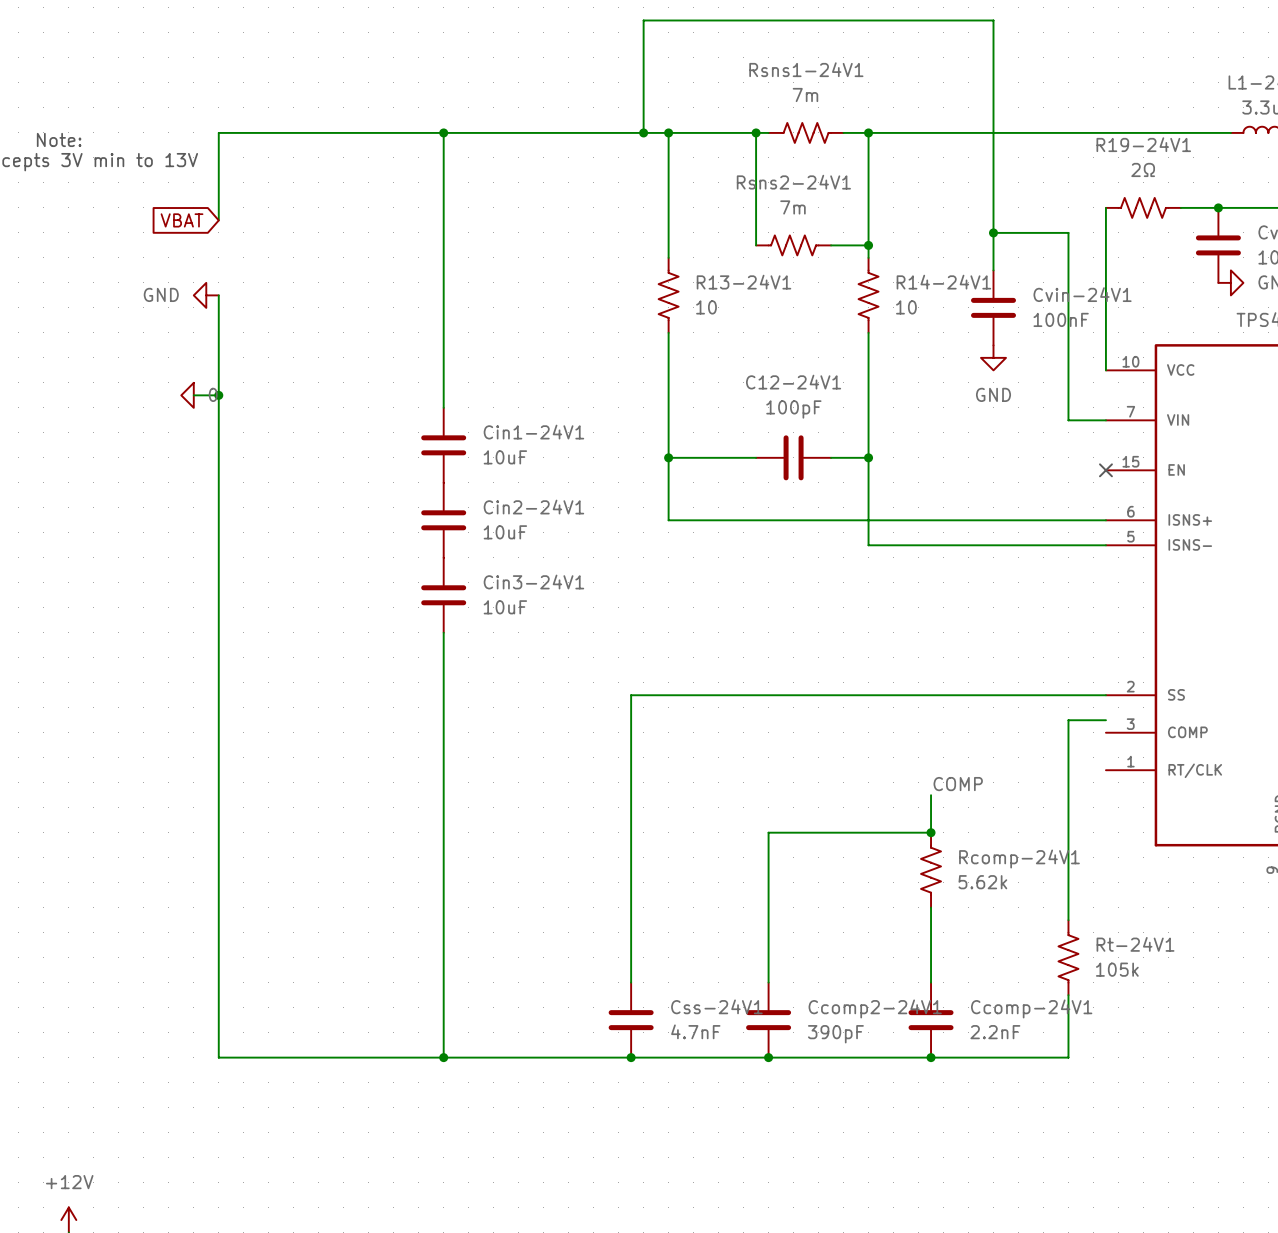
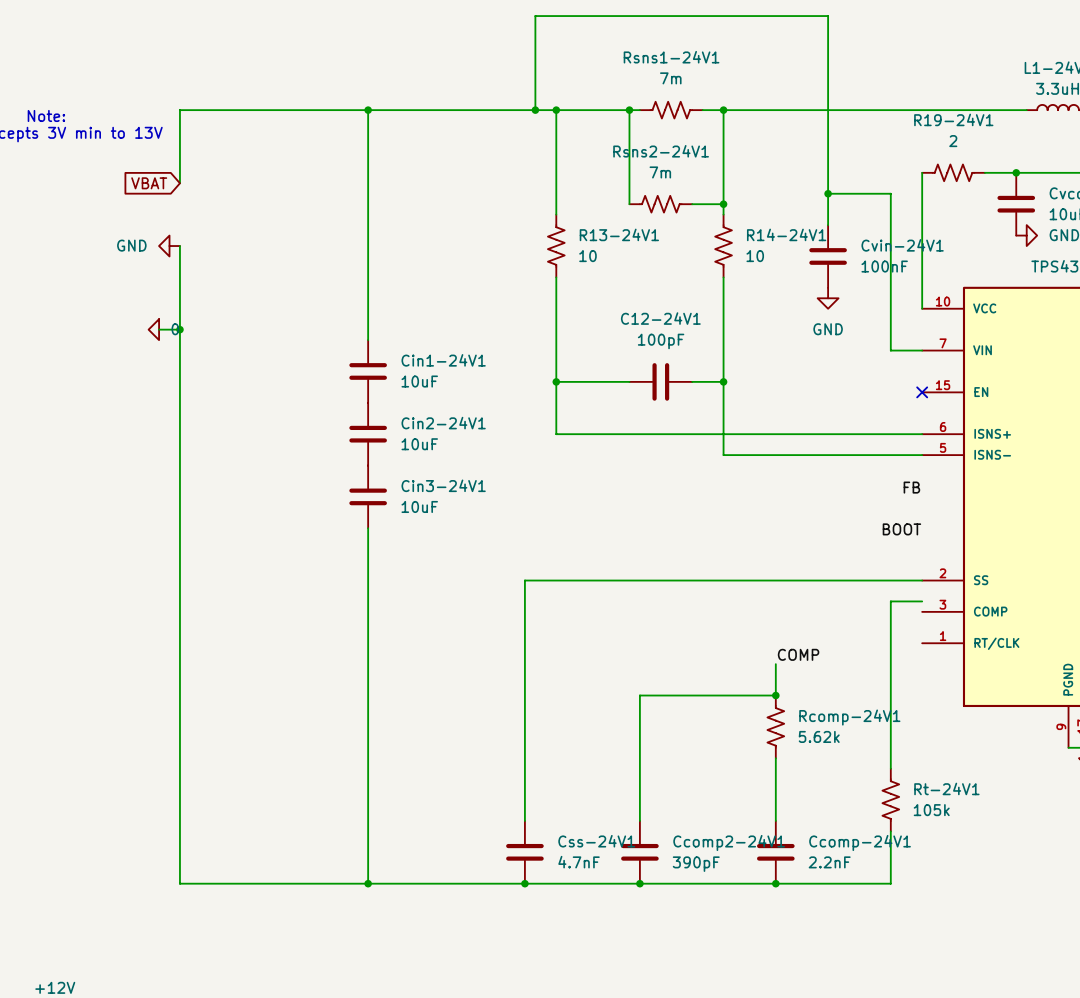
R19-24V1 value: 2Ω (1143, 169) -> 2 (953, 141)
label: none -> FB (911, 487)
label: none -> BOOT (901, 529)

